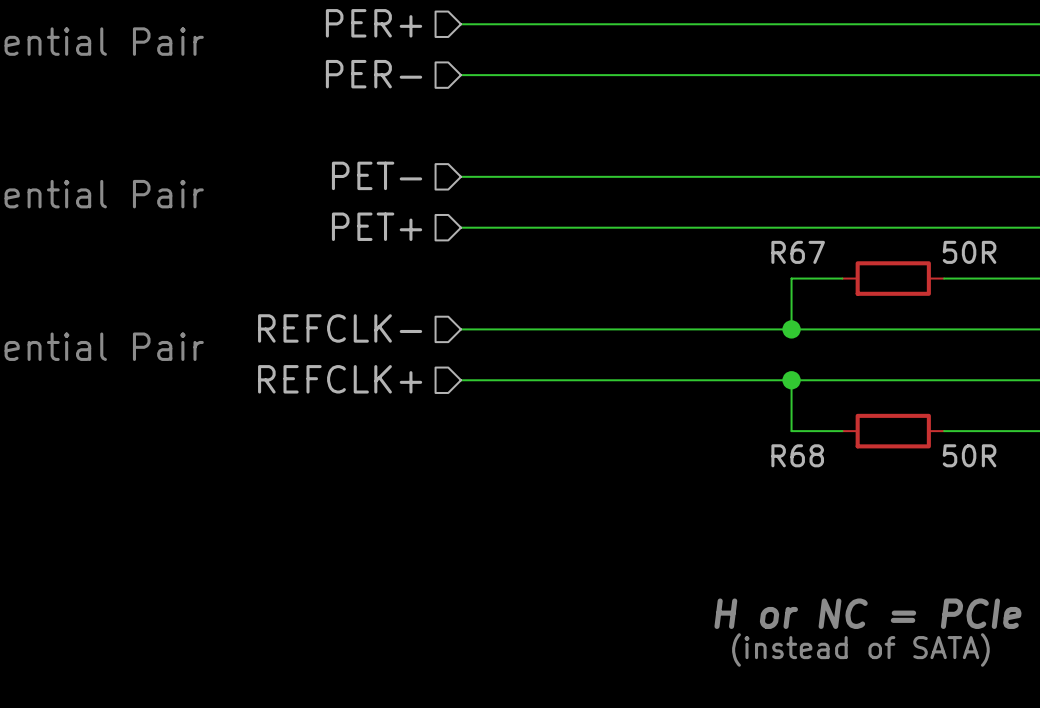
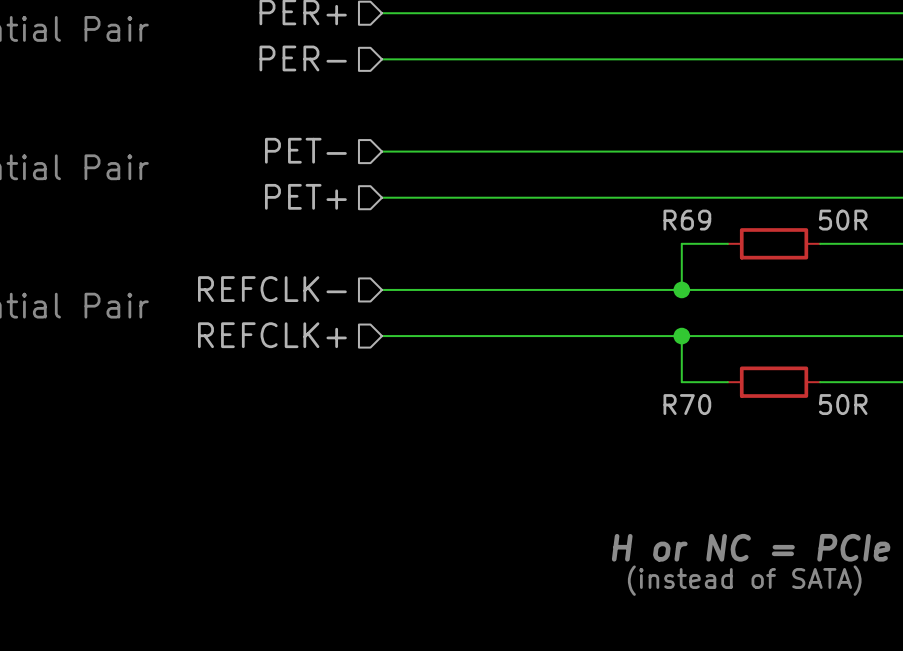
R67 name: R67 (798, 252) -> R69 (687, 220)
R68 name: R68 (797, 455) -> R70 (687, 404)

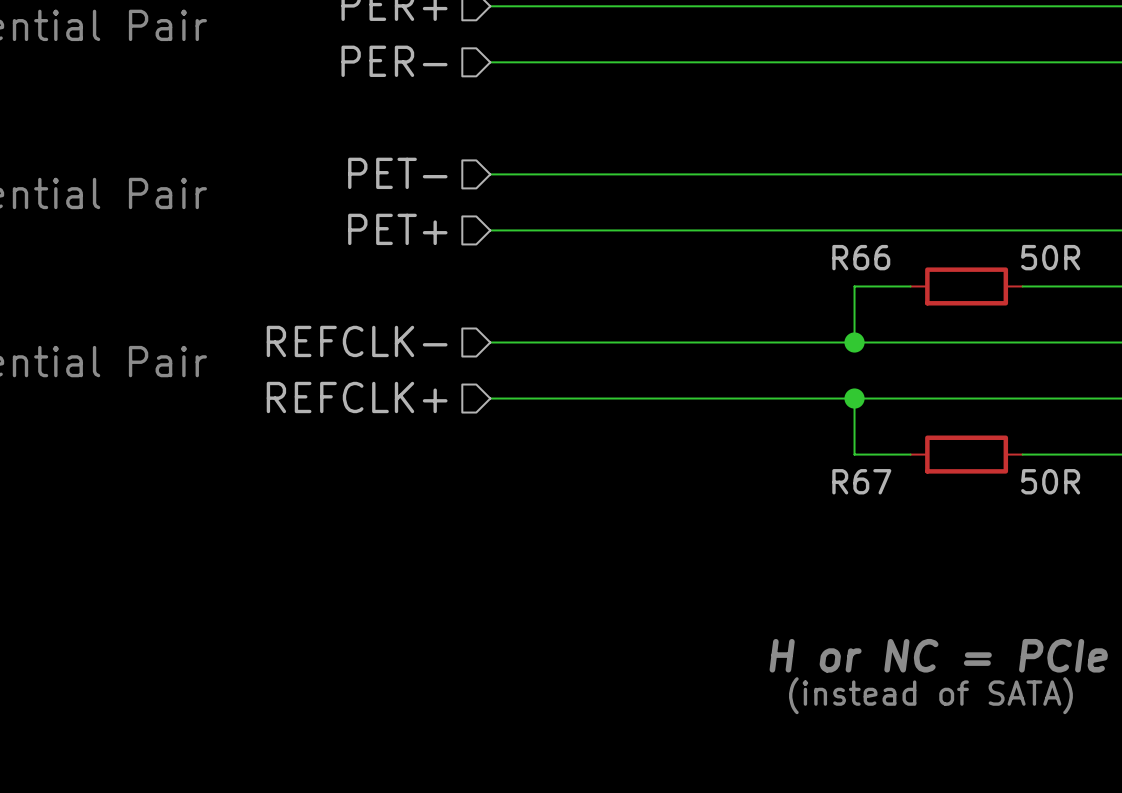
R69 name: R69 (687, 220) -> R66 (861, 257)
R70 name: R70 (687, 404) -> R67 (861, 481)

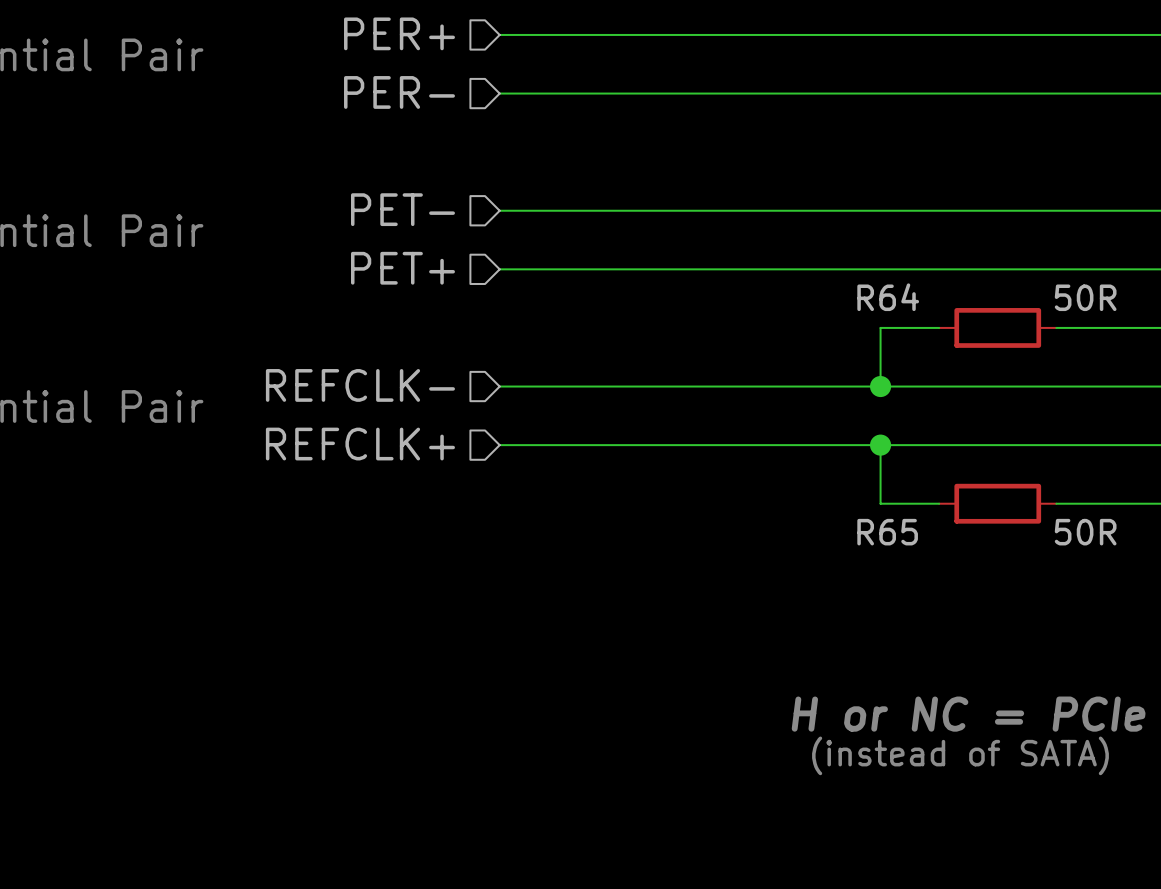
R66 name: R66 (861, 257) -> R64 (888, 297)
R67 name: R67 (861, 481) -> R65 (887, 532)

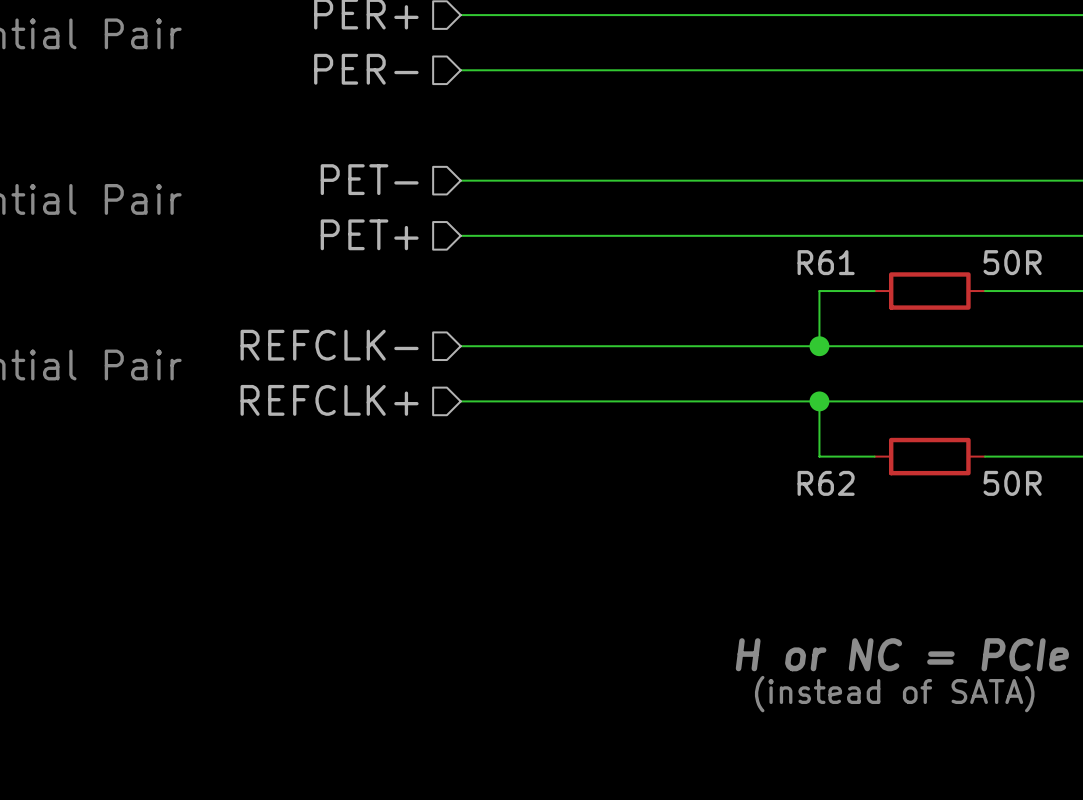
R64 name: R64 (888, 297) -> R61 (826, 262)
R65 name: R65 (887, 532) -> R62 (826, 483)

